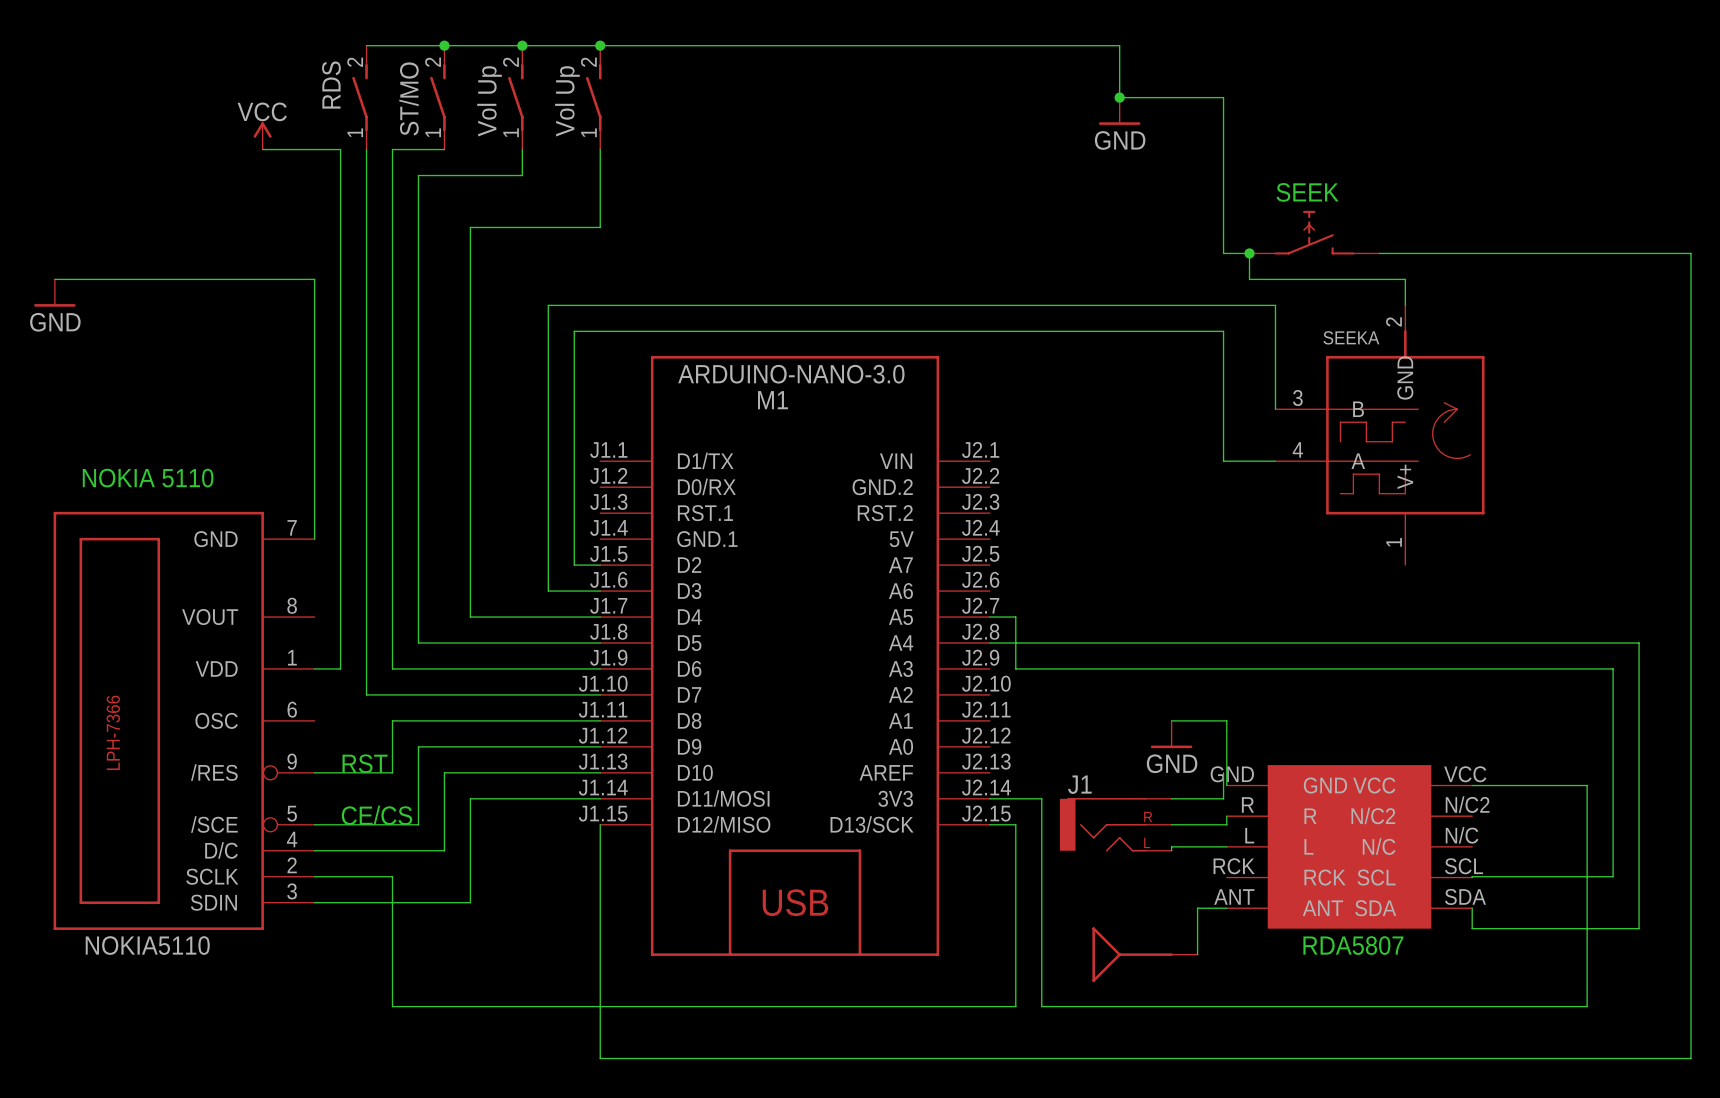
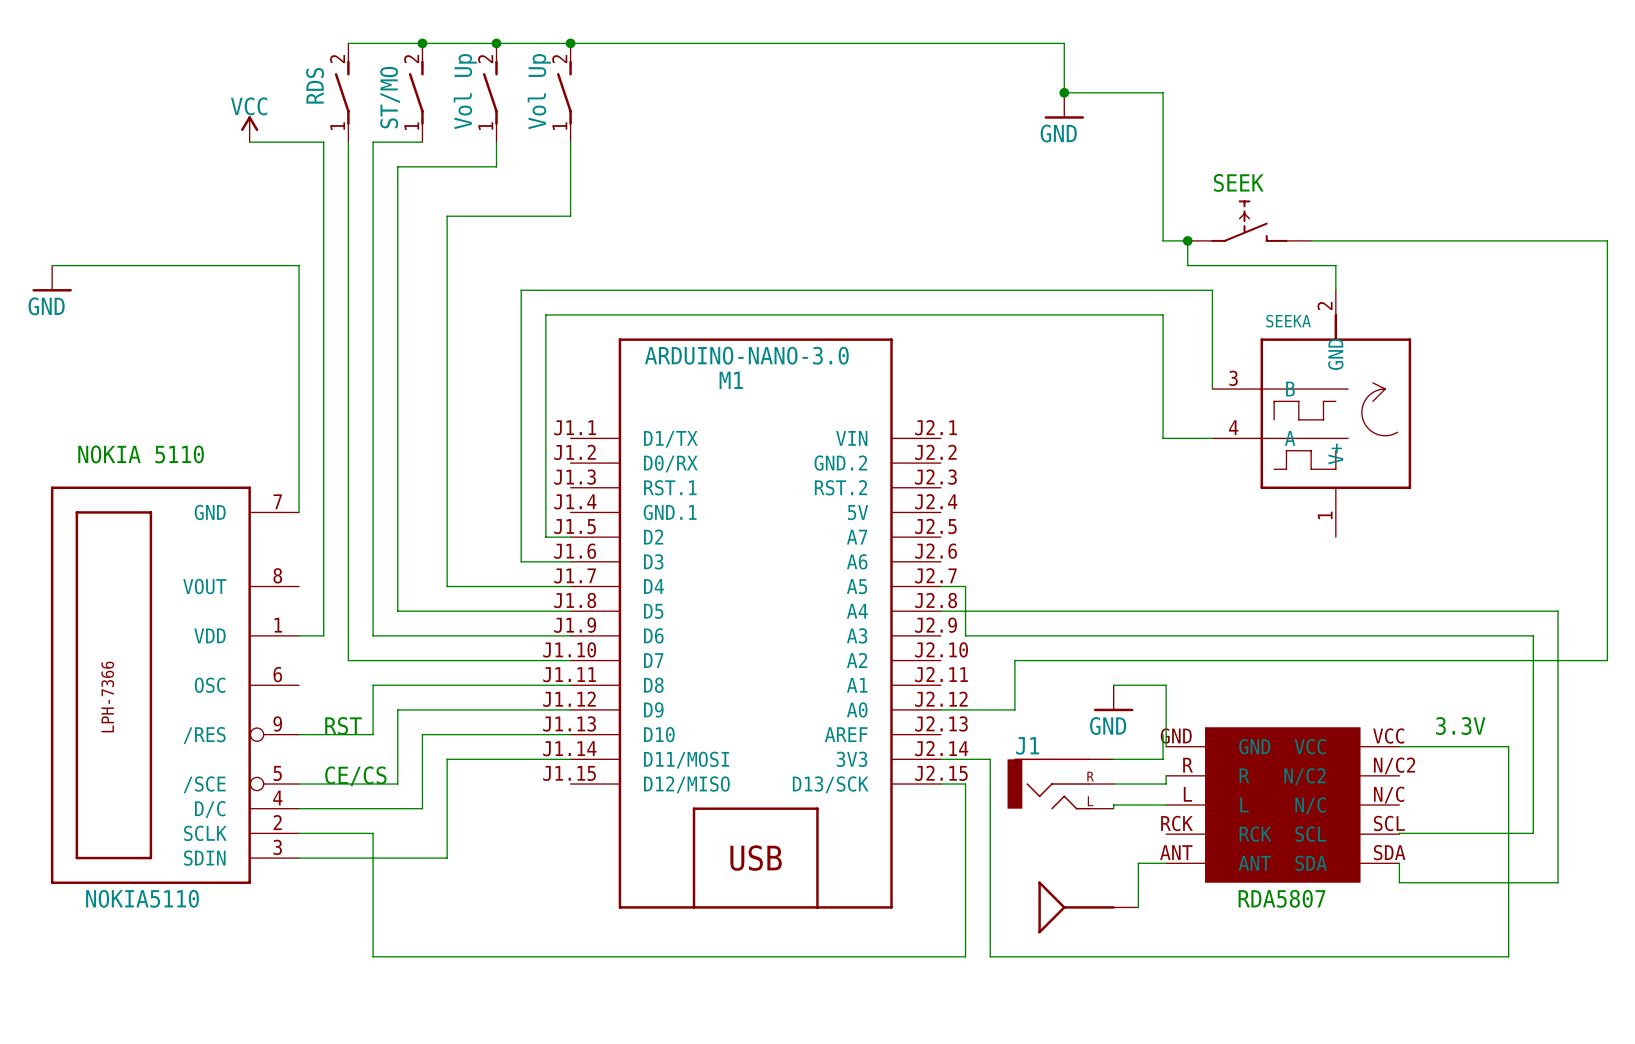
wire: (1691, 694) (1691, 1058) (600, 1058) (600, 824) -> (1607, 660) (1014, 660) (1014, 709) (940, 709)
text: none -> 3.3V (1460, 726)

